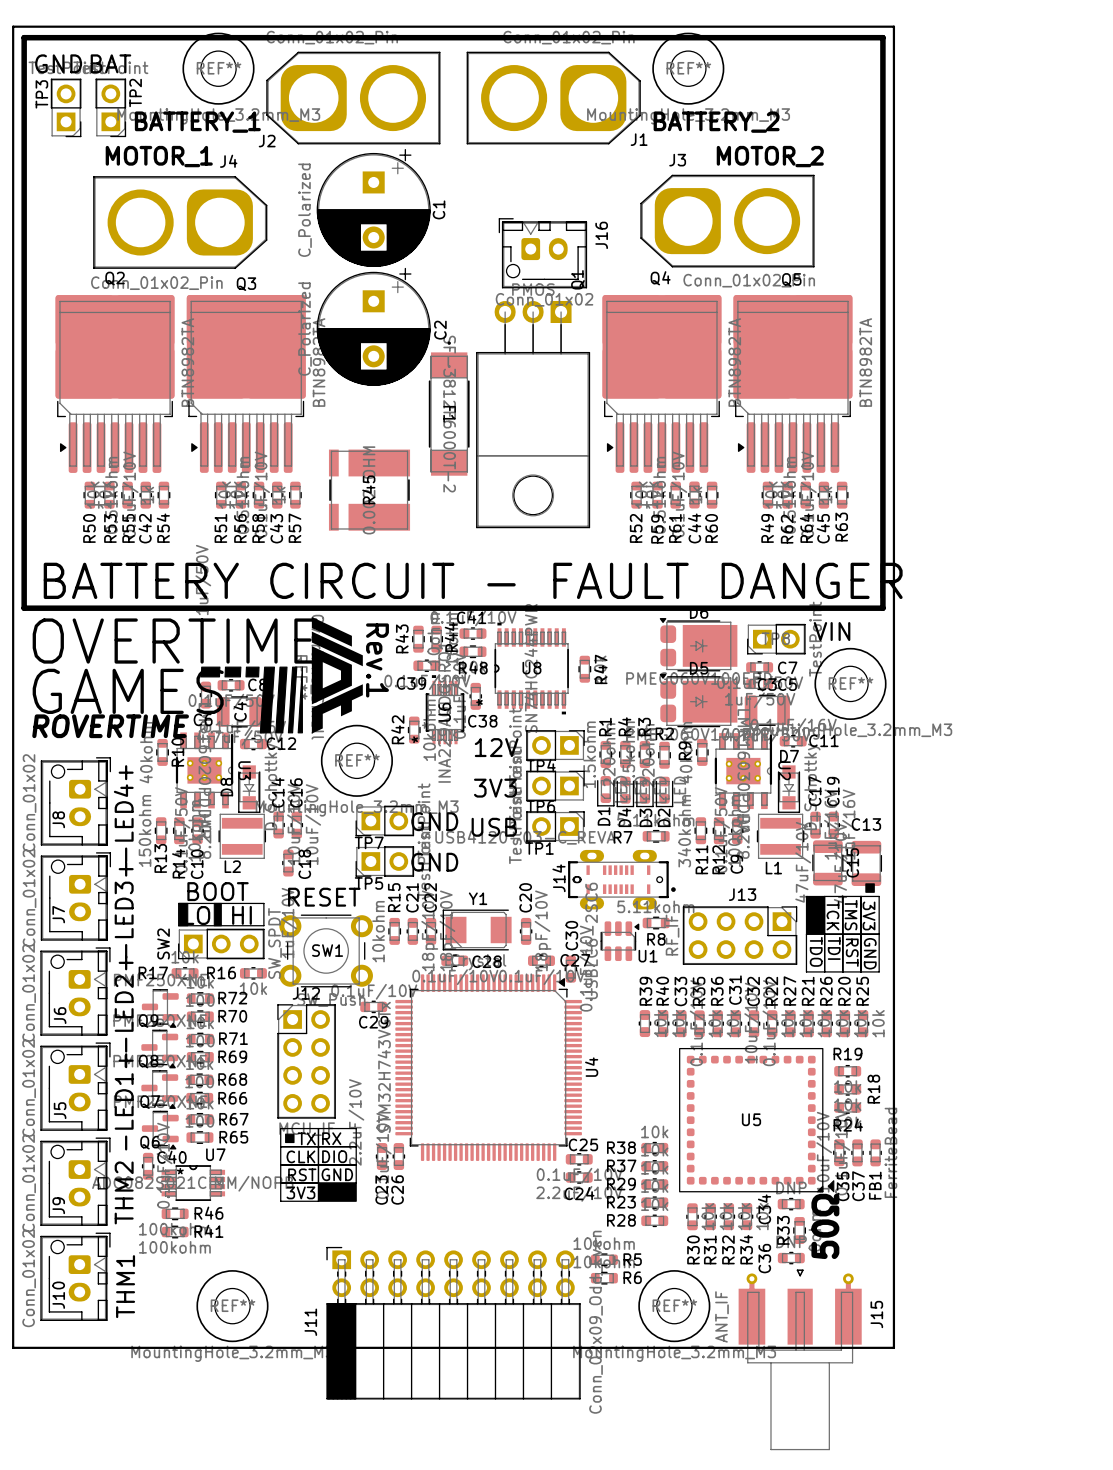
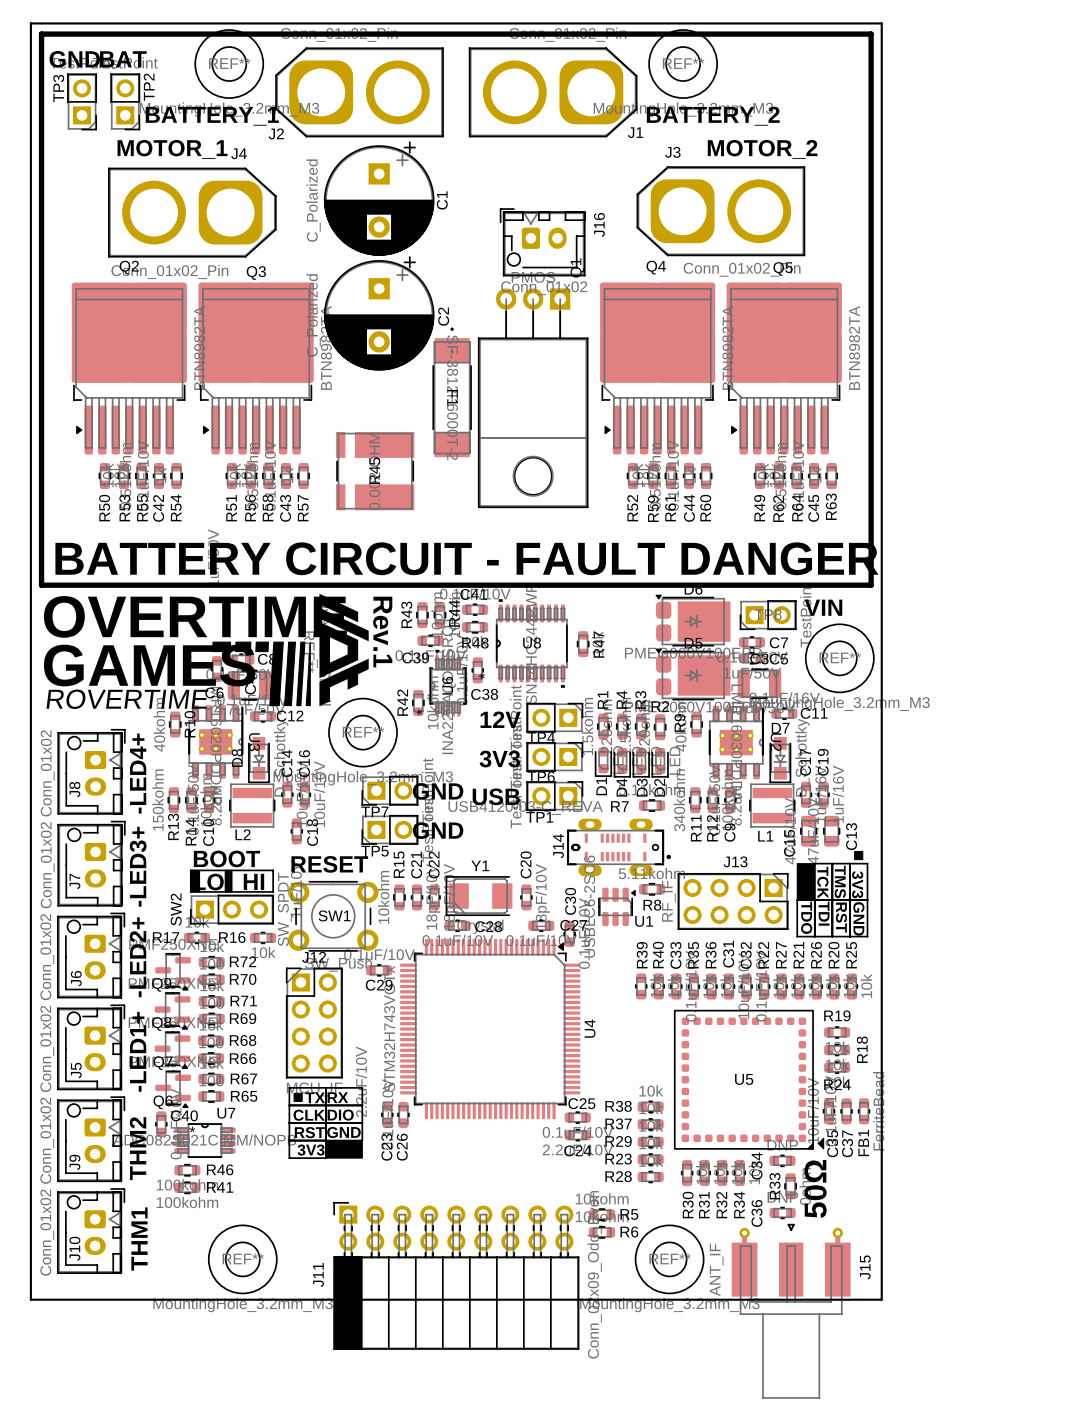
C13 name position: C13 (866, 824) -> C13 (851, 836)
C15 footprint: [812, 840, 844, 886] -> [800, 815, 818, 847]
C13 footprint: [850, 840, 883, 887] -> [823, 815, 841, 847]
C15 name position: C15 (852, 862) -> C15 (789, 843)

